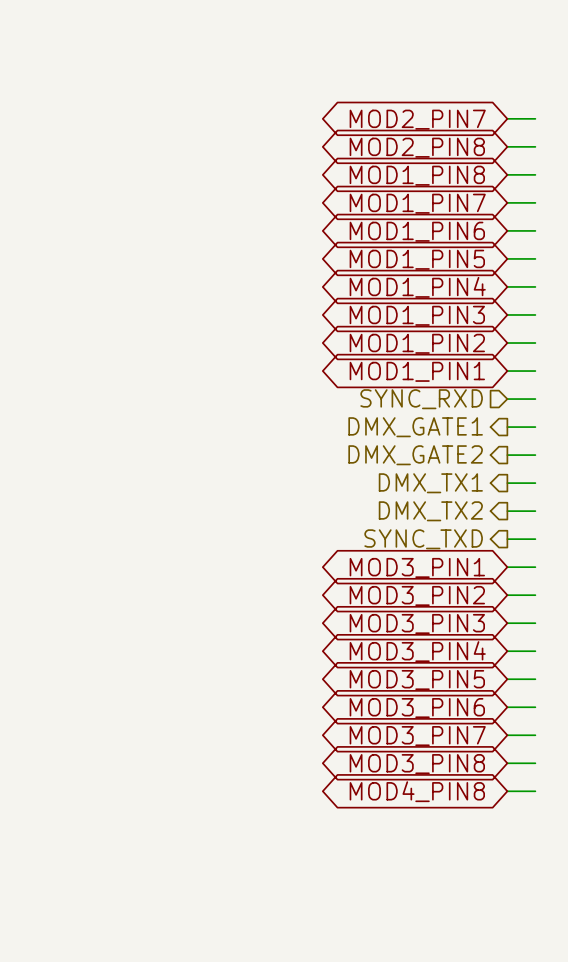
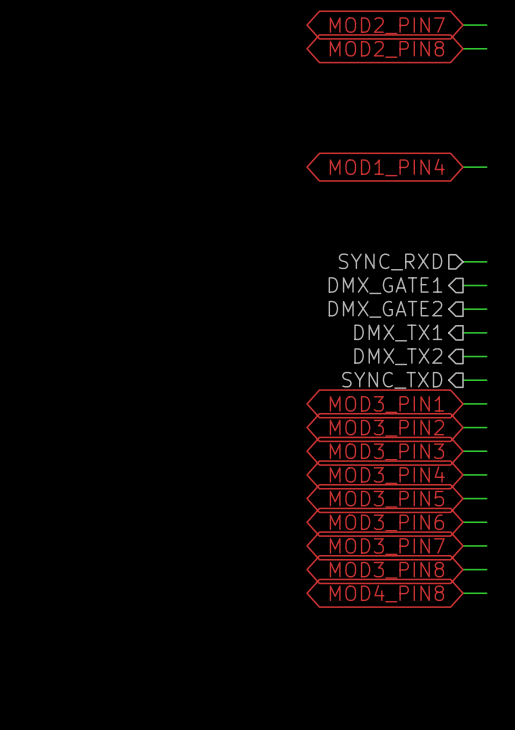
wire: (507, 174) (535, 174) -> none
global label: MOD1_PIN8 (417, 175) -> none
wire: (507, 202) (535, 202) -> none
global label: MOD1_PIN7 (417, 203) -> none
wire: (507, 230) (535, 230) -> none
global label: MOD1_PIN6 (417, 231) -> none
wire: (507, 258) (535, 258) -> none
global label: MOD1_PIN5 (417, 259) -> none
wire: (507, 314) (535, 314) -> none
global label: MOD1_PIN3 (417, 315) -> none
global label: MOD1_PIN2 (417, 343) -> none
wire: (507, 343) (535, 343) -> none
global label: MOD1_PIN1 (417, 371) -> none
wire: (507, 371) (535, 371) -> none

